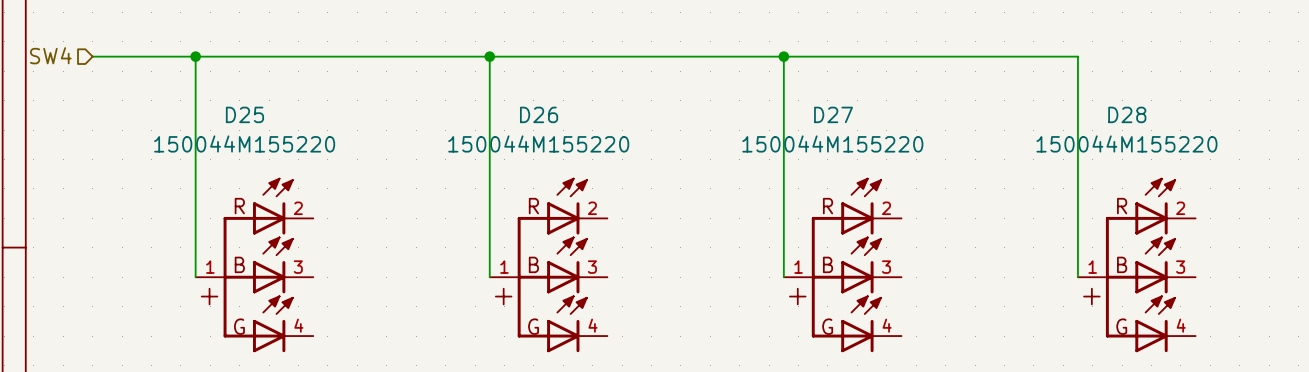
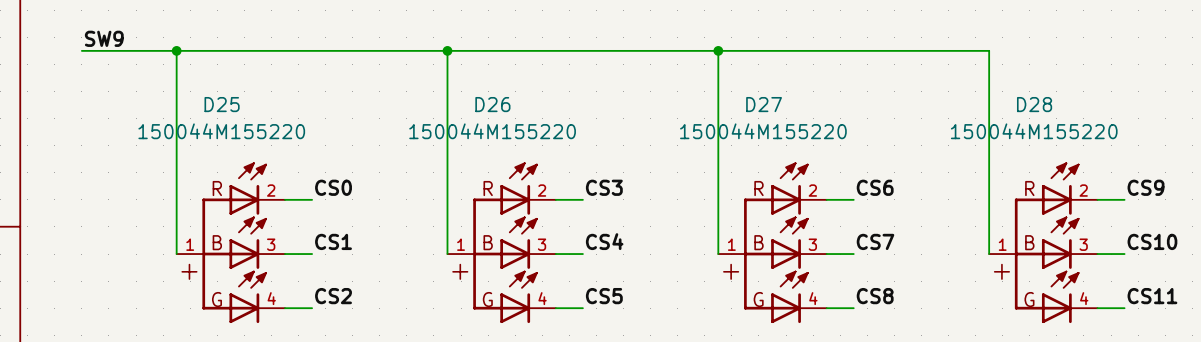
label: none -> SW9 (104, 38)
hierarchical label: SW4 (50, 55) -> none
label: none -> CS0 (333, 187)
label: none -> CS3 (604, 187)
label: none -> CS6 (875, 187)
label: none -> CS9 (1146, 187)
wire: none -> (284, 199) (312, 199)
wire: none -> (555, 199) (582, 199)
wire: none -> (826, 199) (853, 199)
wire: none -> (1097, 199) (1124, 199)
label: none -> CS4 (604, 241)
label: none -> CS1 (333, 241)
label: none -> CS7 (875, 241)
label: none -> CS10 (1152, 241)
wire: none -> (284, 254) (312, 254)
wire: none -> (555, 254) (582, 254)
wire: none -> (826, 254) (853, 254)
wire: none -> (1097, 254) (1124, 254)
label: none -> CS2 (333, 296)
label: none -> CS5 (604, 296)
label: none -> CS8 (875, 296)
label: none -> CS11 (1152, 296)
wire: none -> (284, 308) (312, 308)
wire: none -> (555, 308) (582, 308)
wire: none -> (826, 308) (853, 308)
wire: none -> (1097, 308) (1124, 308)

